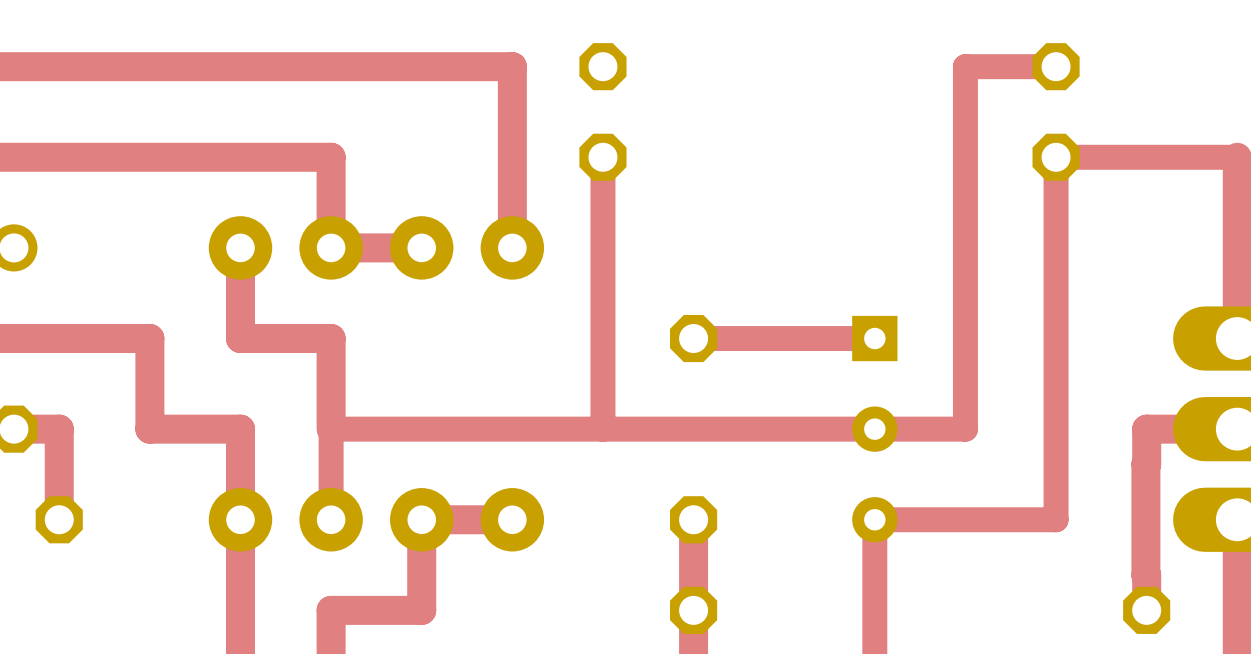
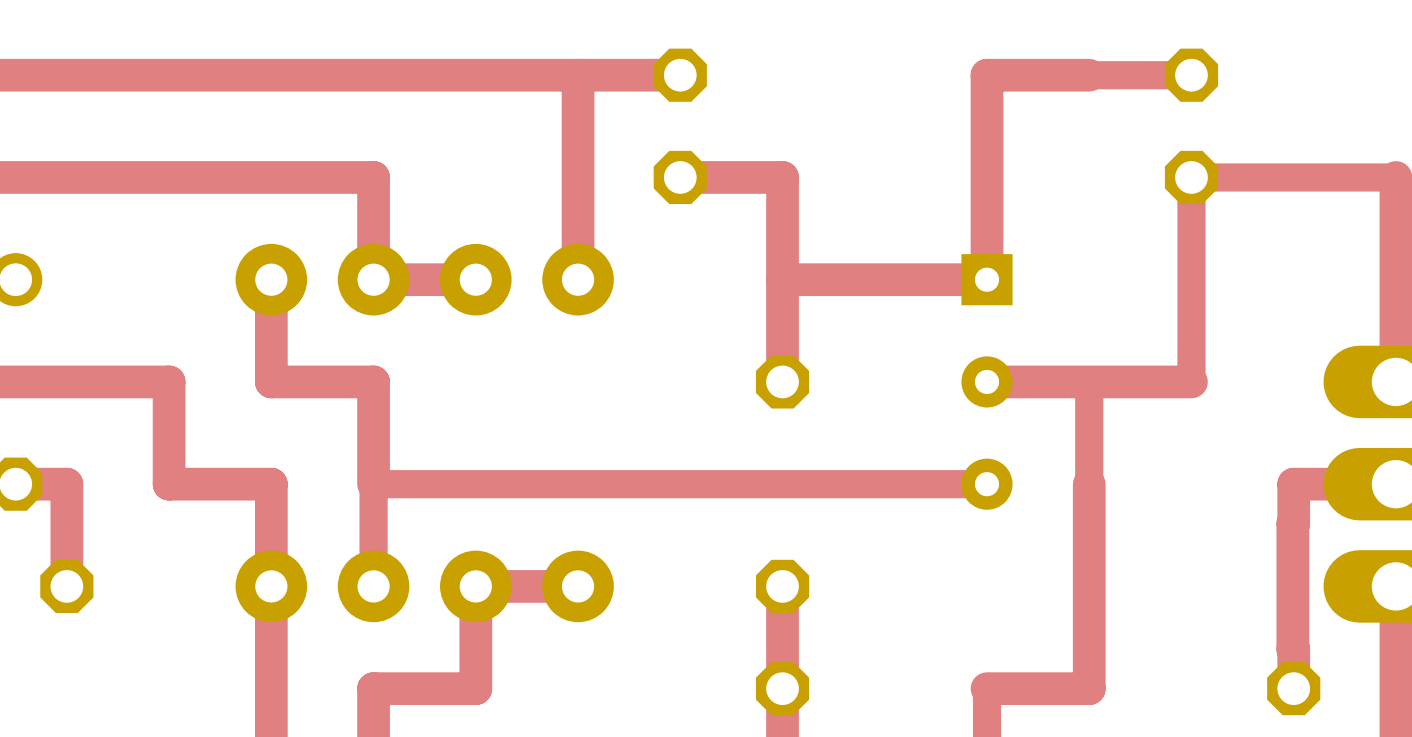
top track: (965, 66) (965, 338) -> (1089, 75) (987, 75) (987, 279) (782, 279)
top track: (602, 157) (602, 429) -> (680, 177) (782, 177) (782, 381)
top track: (874, 338) (693, 338) -> (987, 381) (1191, 381)
top track: (1056, 338) (1056, 519) (874, 519) (874, 610) -> (1089, 484) (1089, 688) (987, 688)
part position: (874, 429) -> (987, 381)
top track: (965, 429) (874, 429) -> (680, 75) (578, 75)

